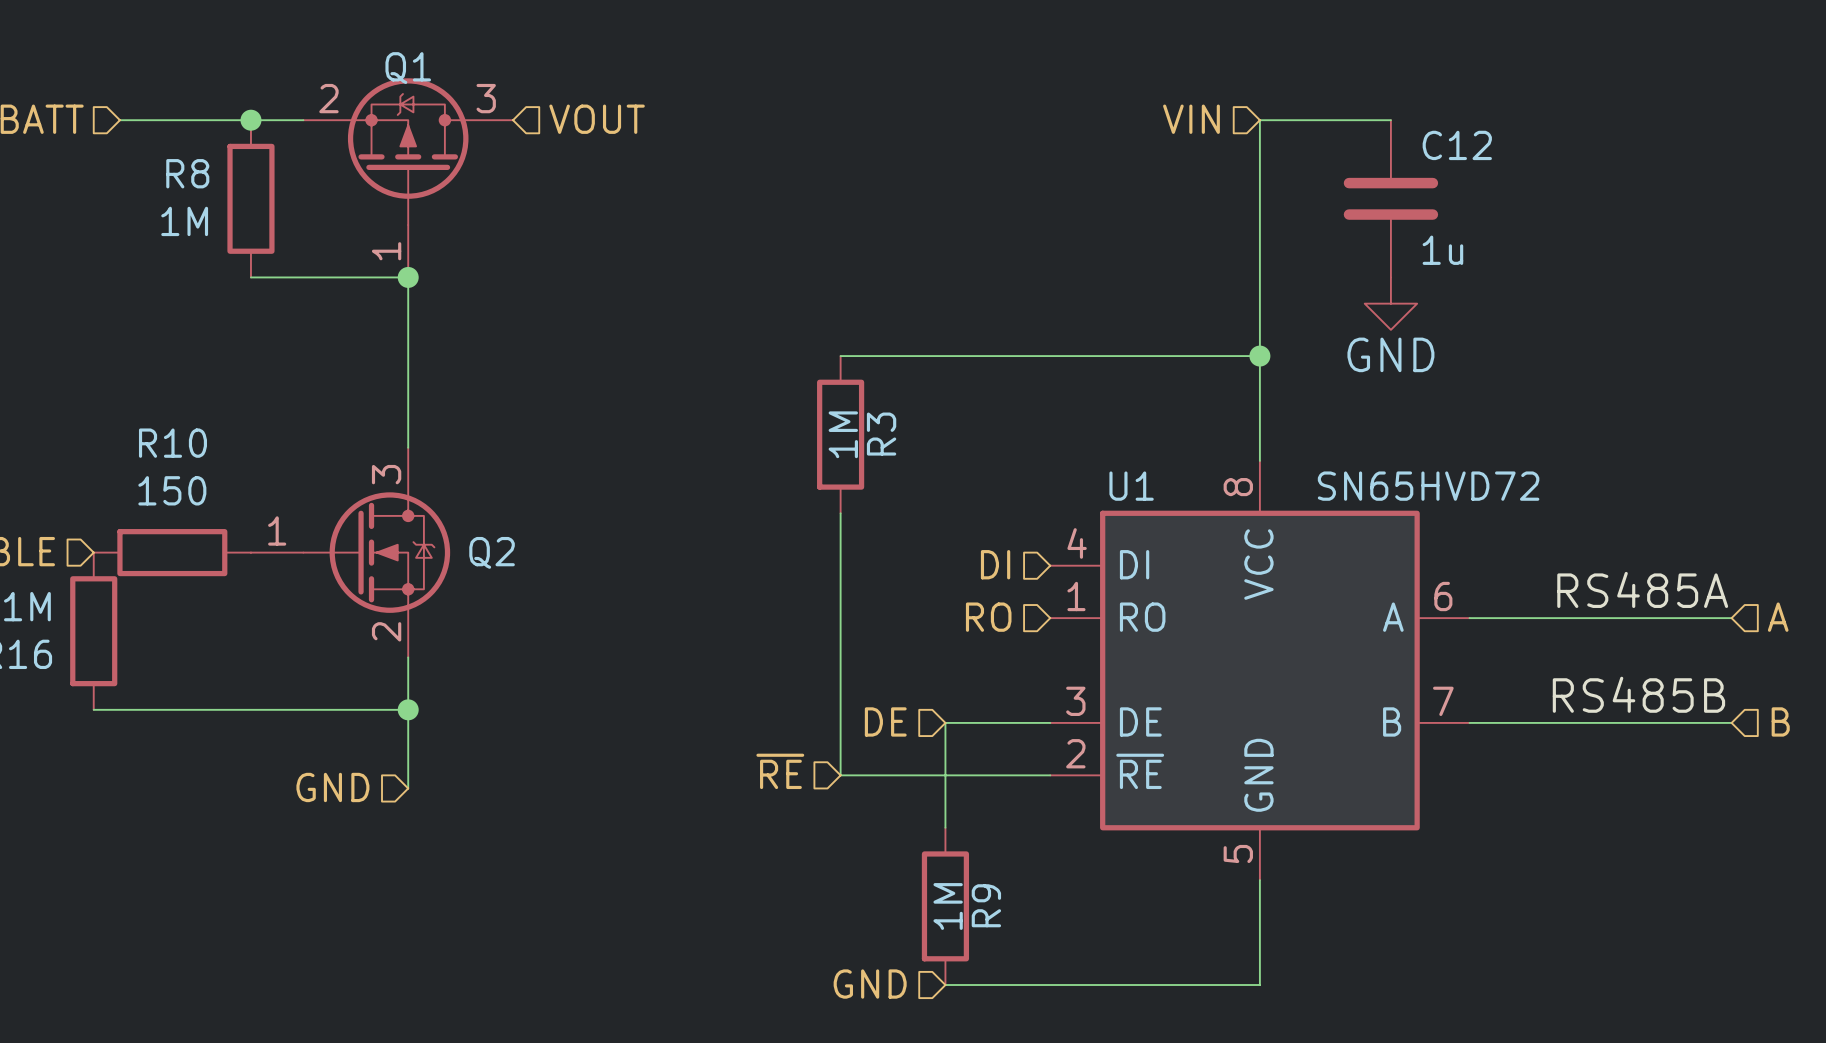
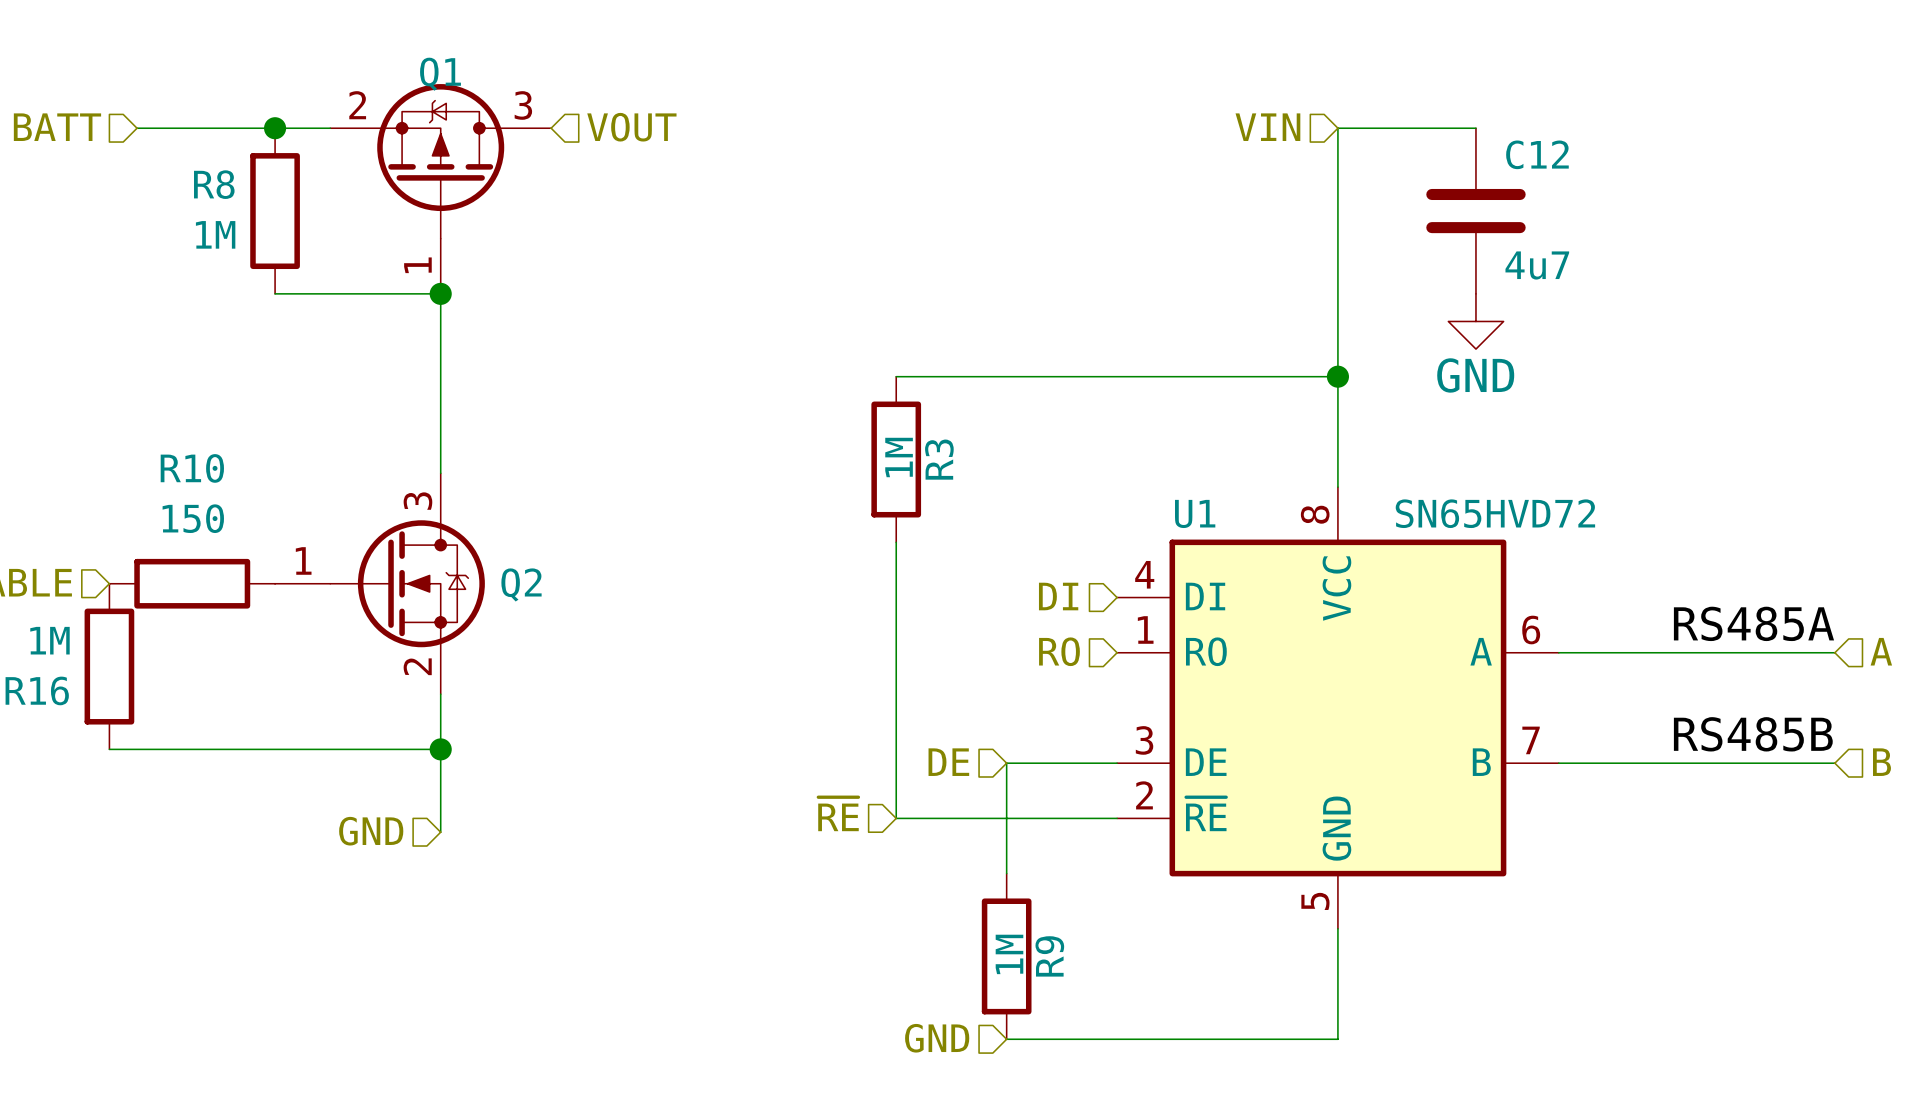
C12 value: 1u (1442, 250) -> 4u7 (1537, 265)

